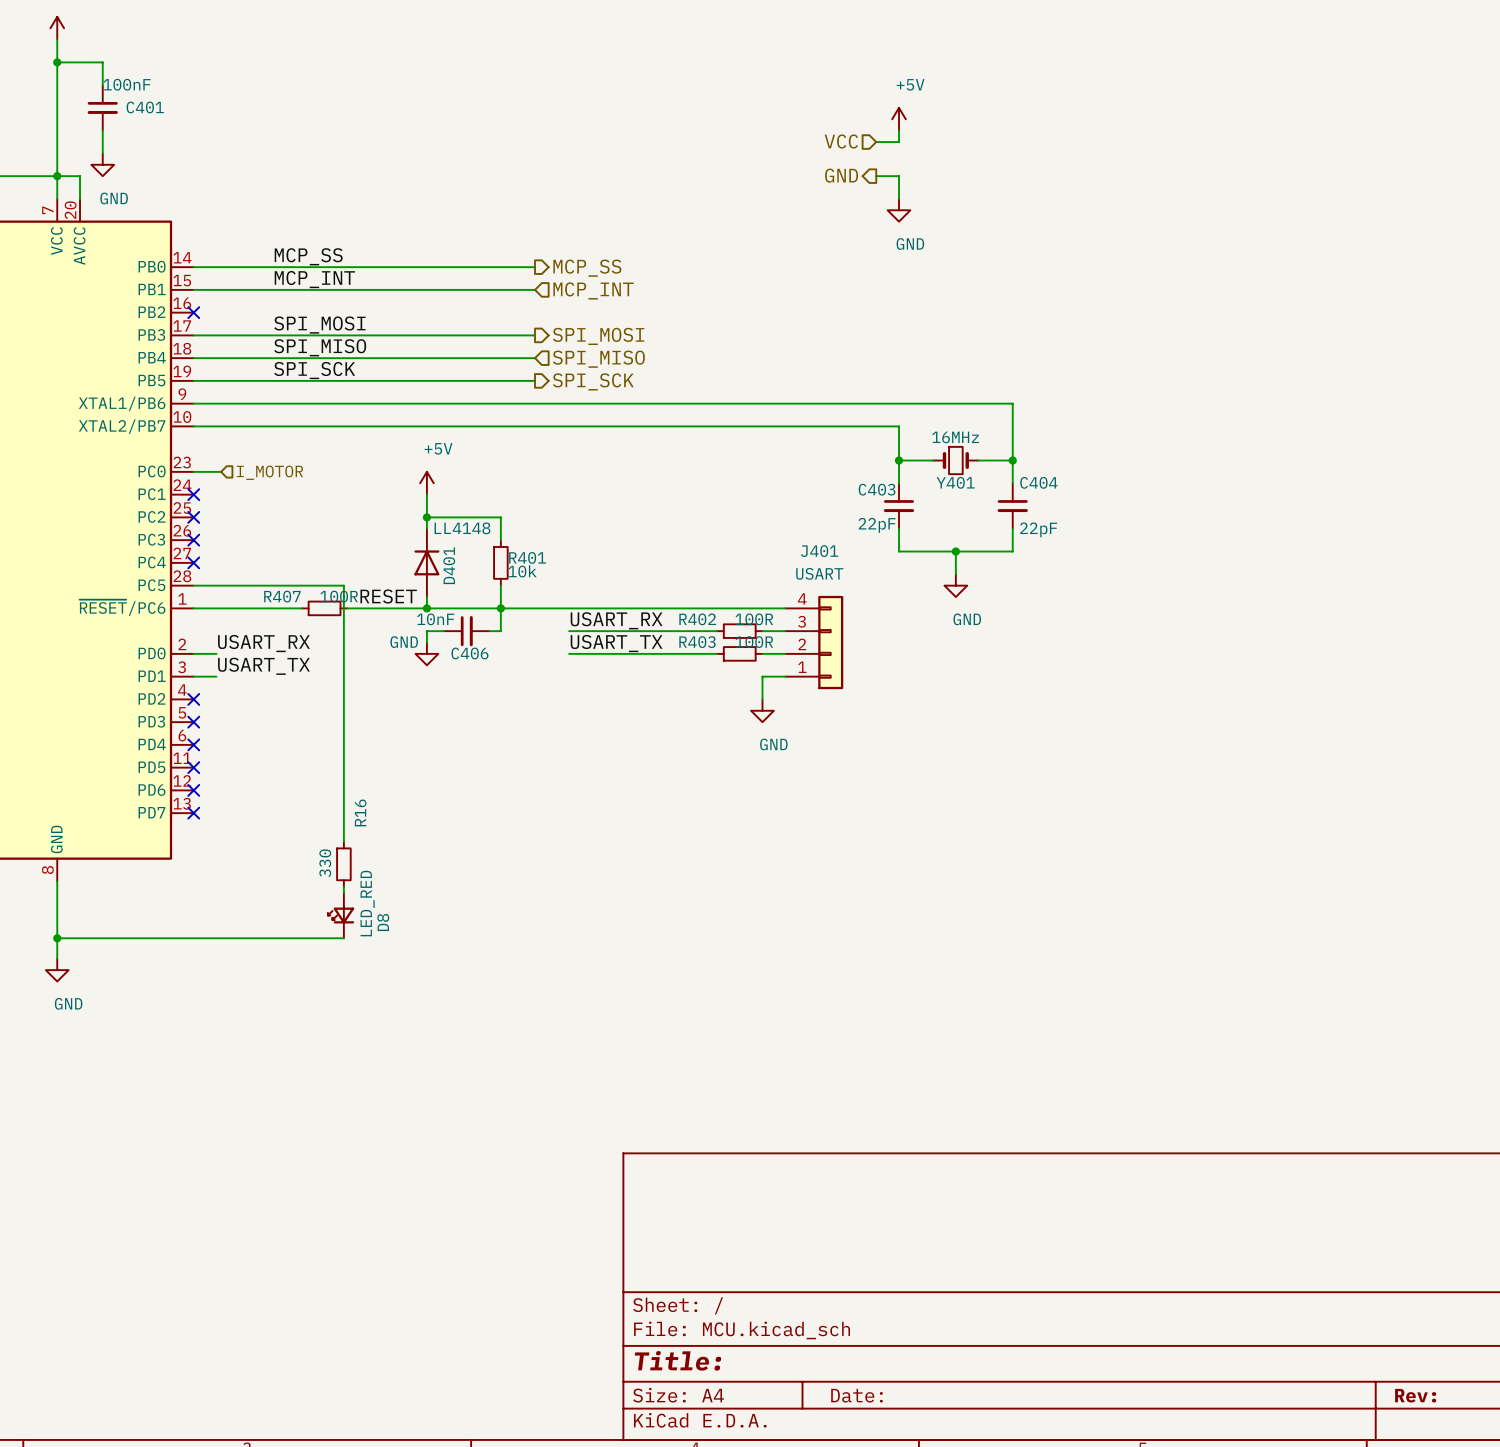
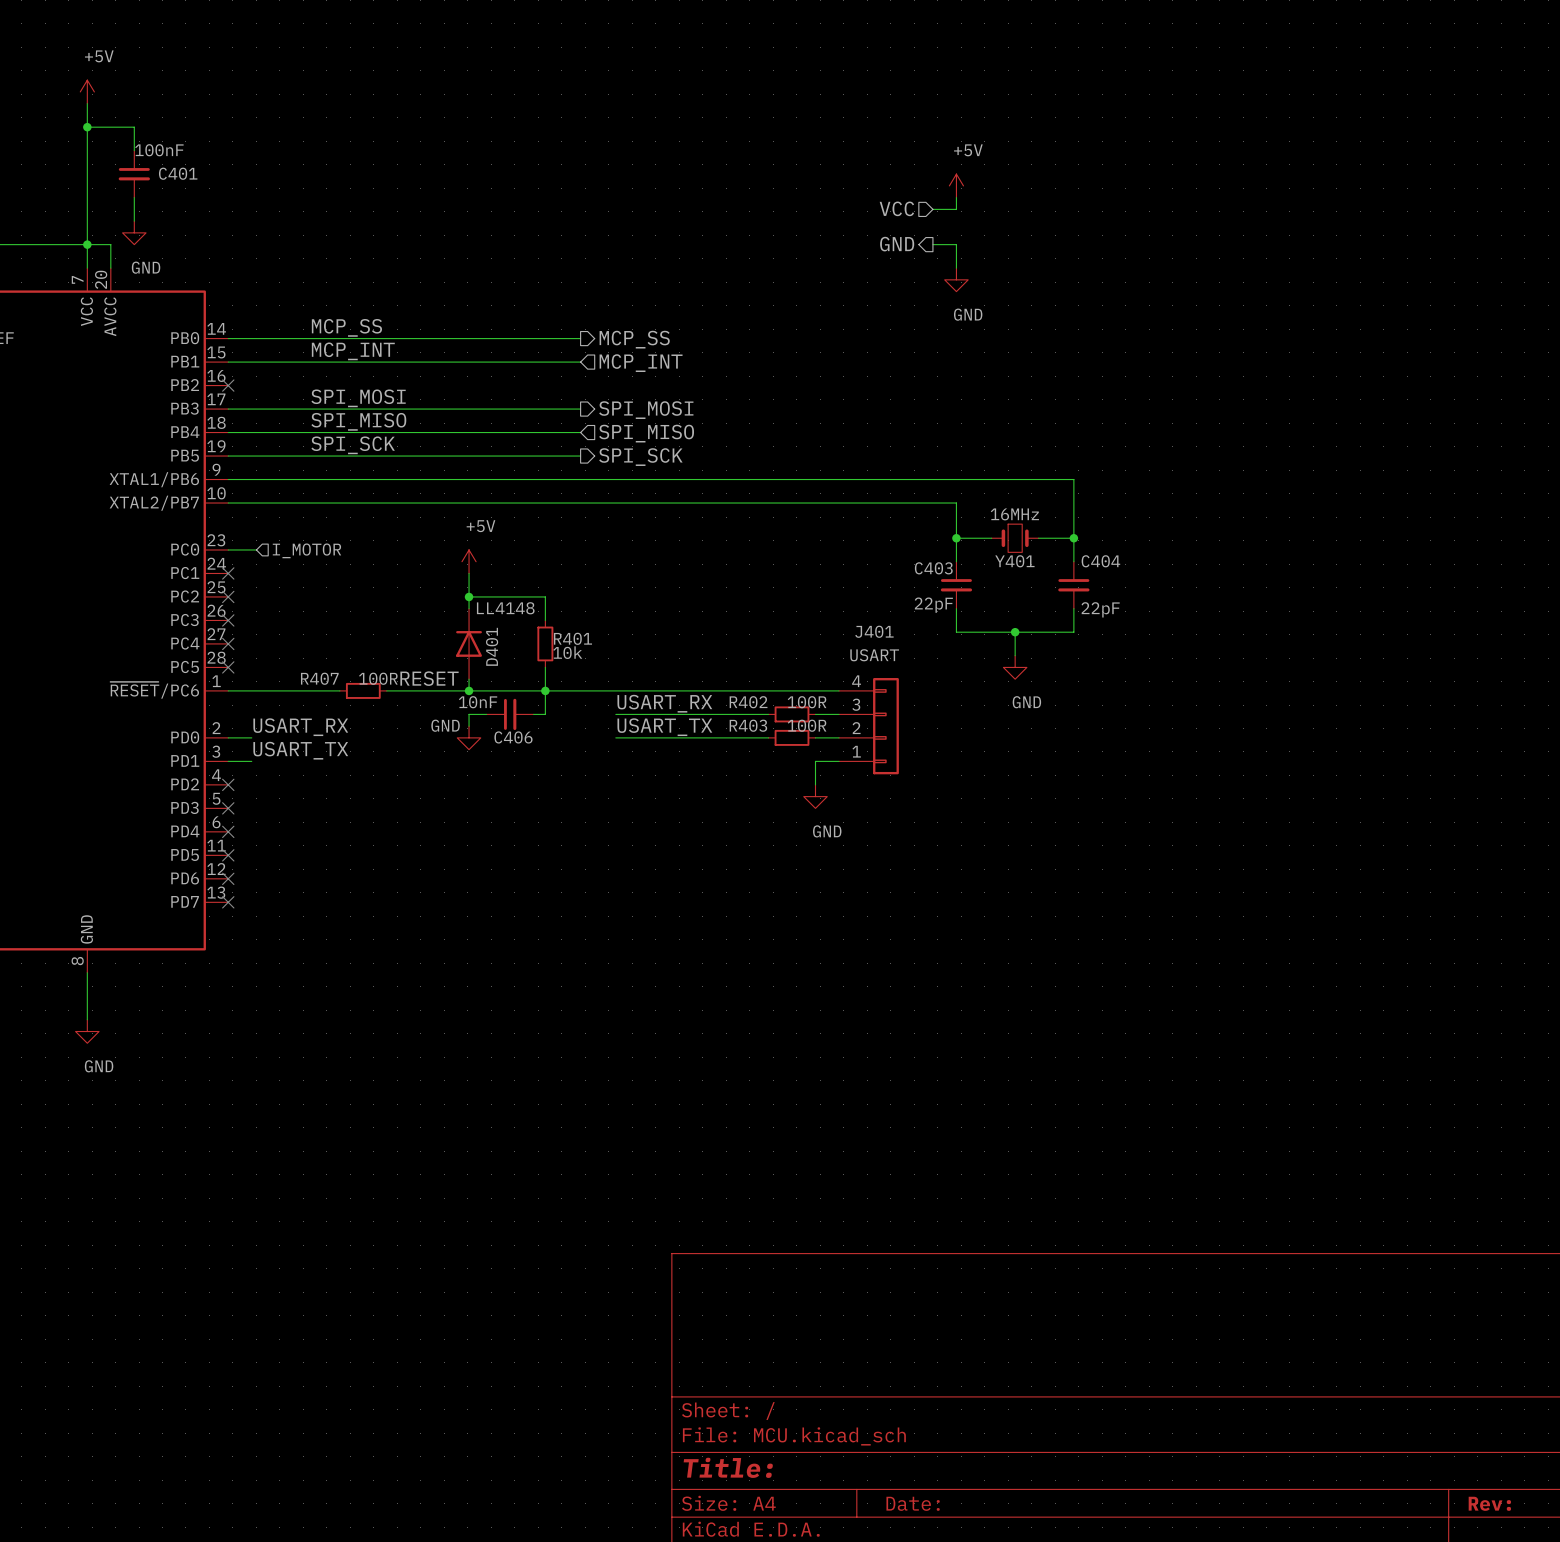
wire: (193, 585) (343, 585) (343, 841) -> none
no-connect mark: none -> (228, 667)
R16: 330 (343, 864) -> none
wire: (343, 887) (343, 892) -> none
D8: LED_RED (341, 915) -> none
wire: (57, 926) (57, 958) -> none
wire: (57, 938) (343, 938) -> none
junction: (57, 938) -> none
power symbol position: GND (57, 970) -> GND (87, 1031)

